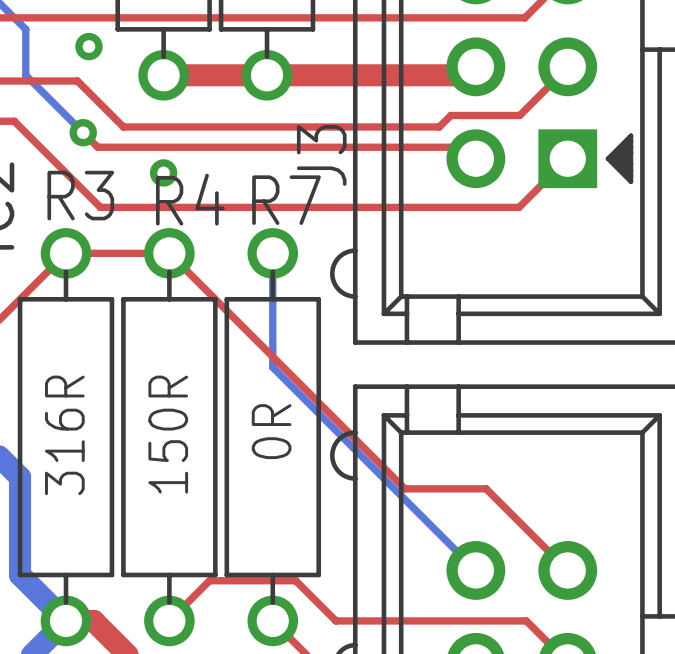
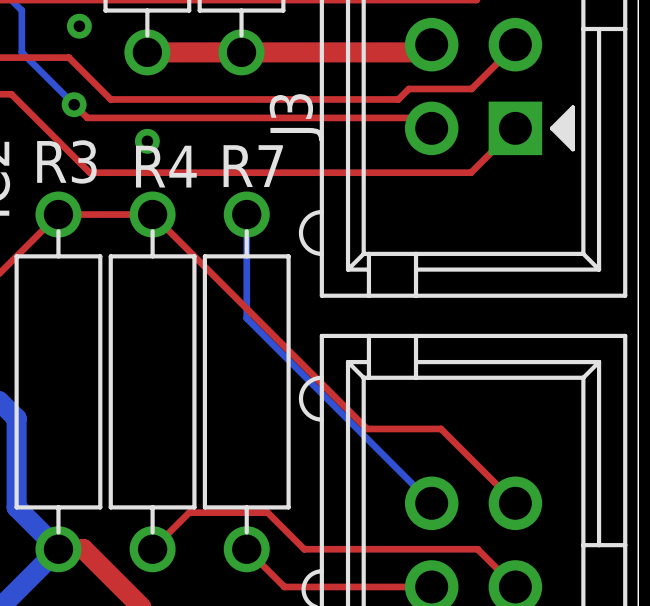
text: 0R (271, 431) -> none
text: 150R (168, 434) -> none
text: 316R (64, 435) -> none

